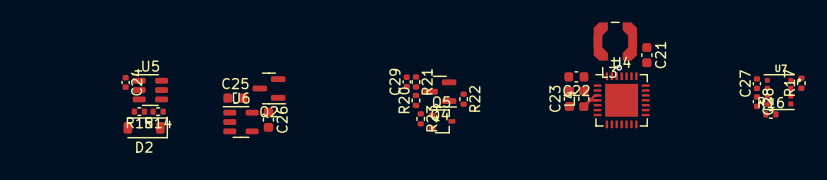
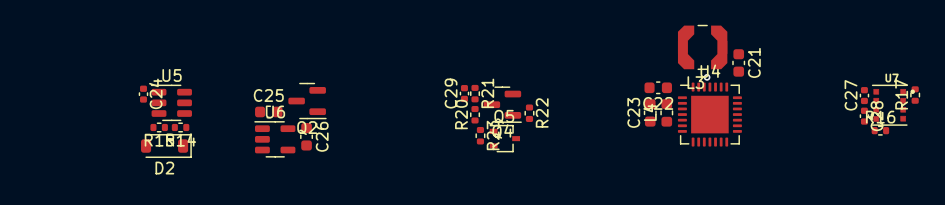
top track: (597, 95) (595, 95) (583, 106) -> none
top track: (590, 100) (597, 100) -> none

